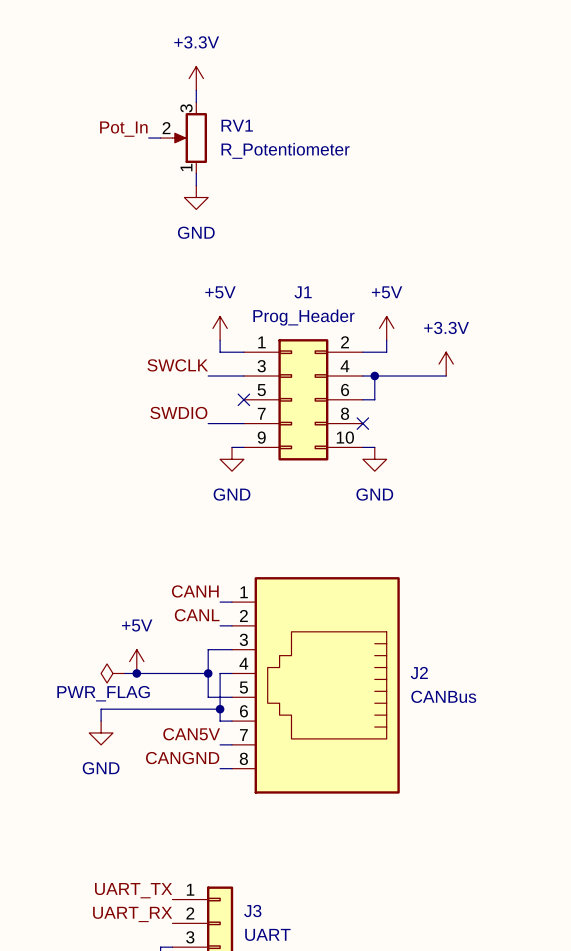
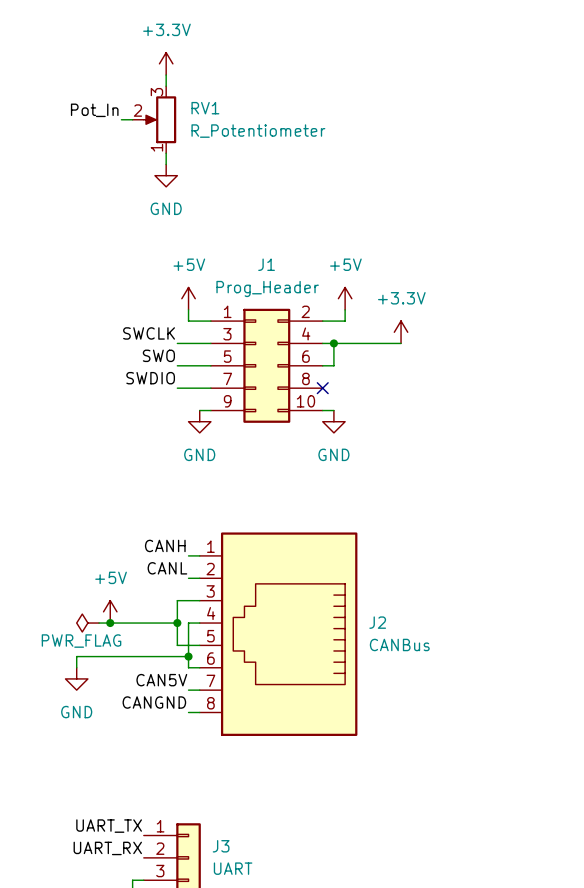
label: none -> SWO (158, 355)
wire: none -> (177, 365) (210, 365)
no-connect mark: (243, 399) -> none

